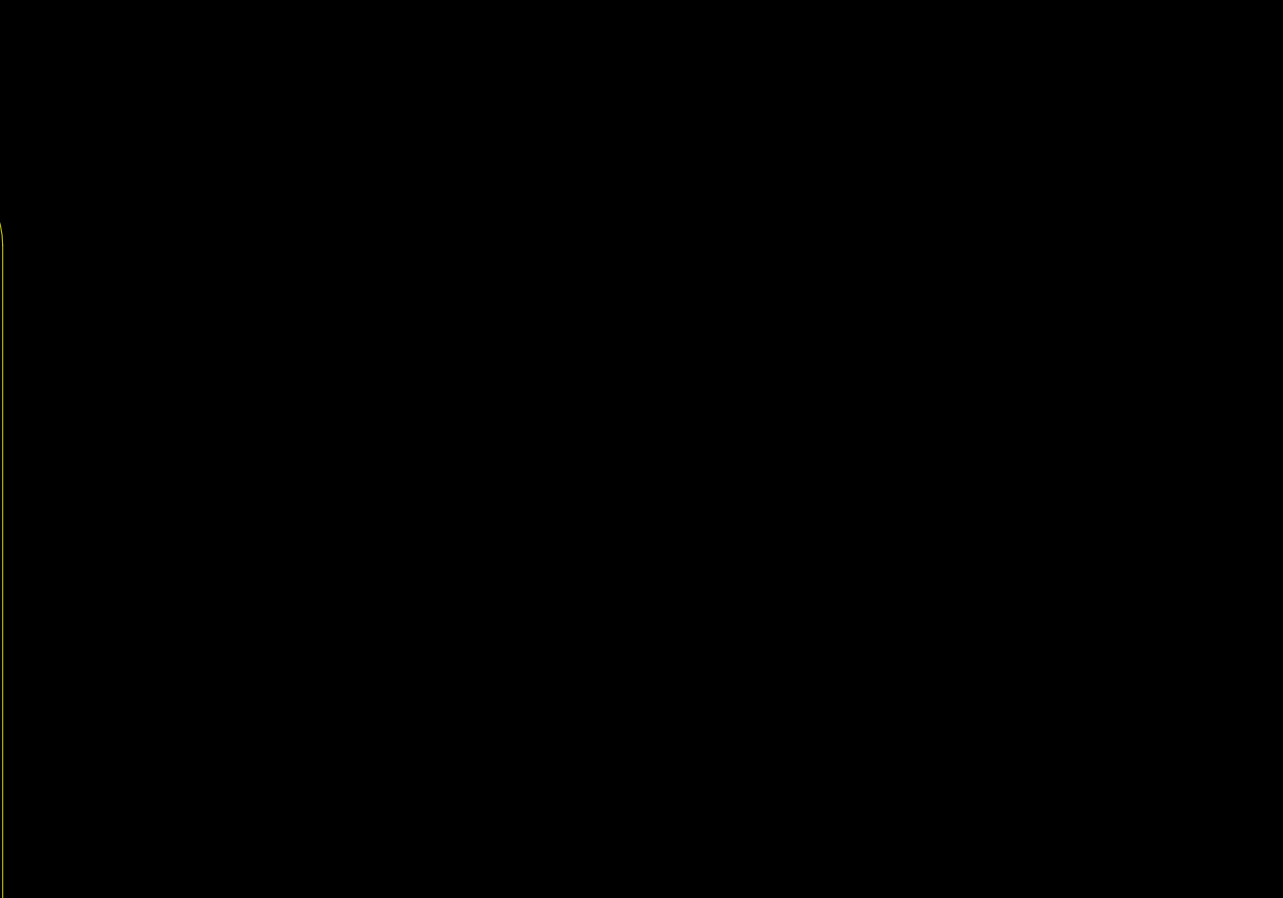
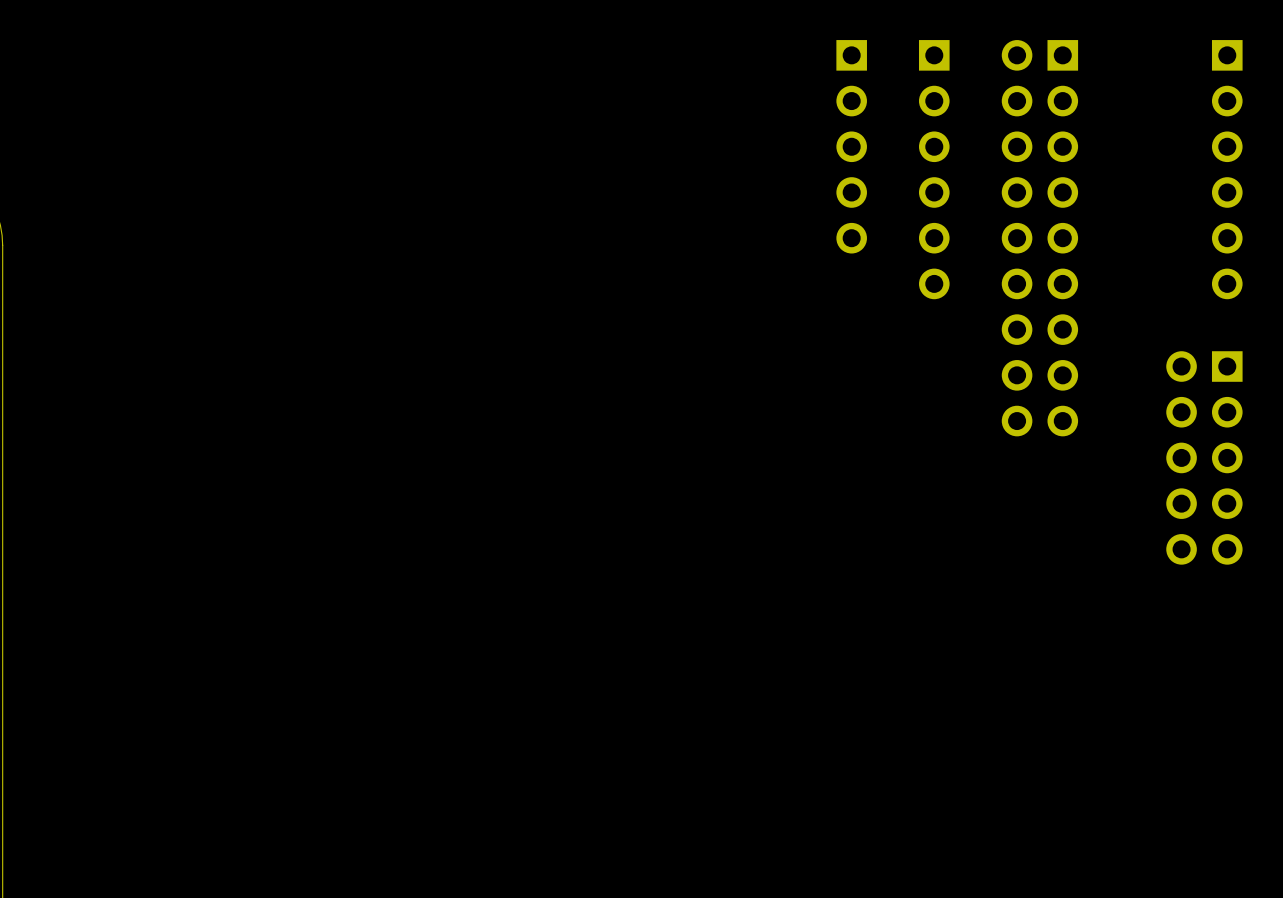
part: none -> (851, 146)
part: none -> (934, 169)
part: none -> (1227, 169)
part: none -> (1039, 238)
part: none -> (1204, 457)

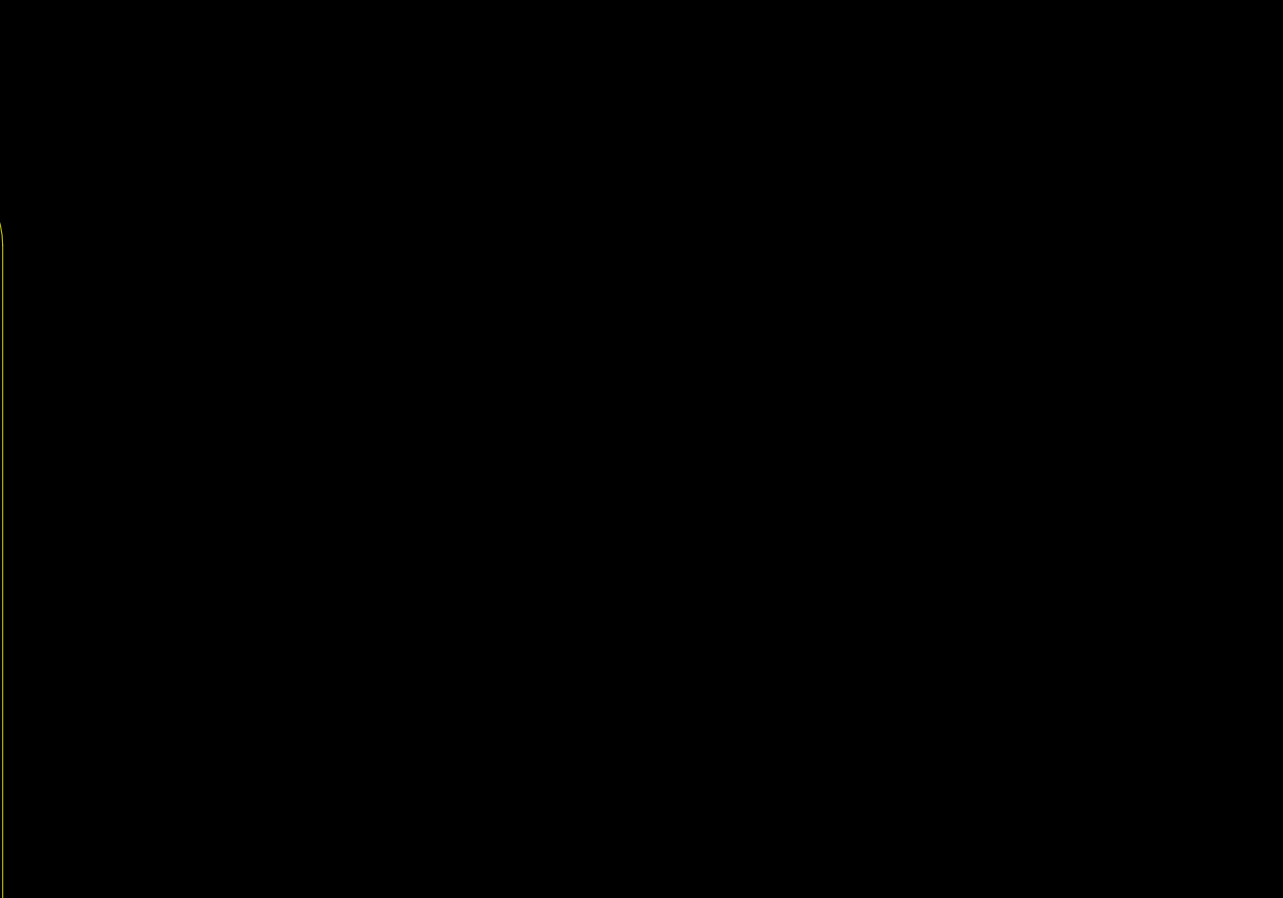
part: (851, 146) -> none
part: (934, 169) -> none
part: (1227, 169) -> none
part: (1039, 238) -> none
part: (1204, 457) -> none

